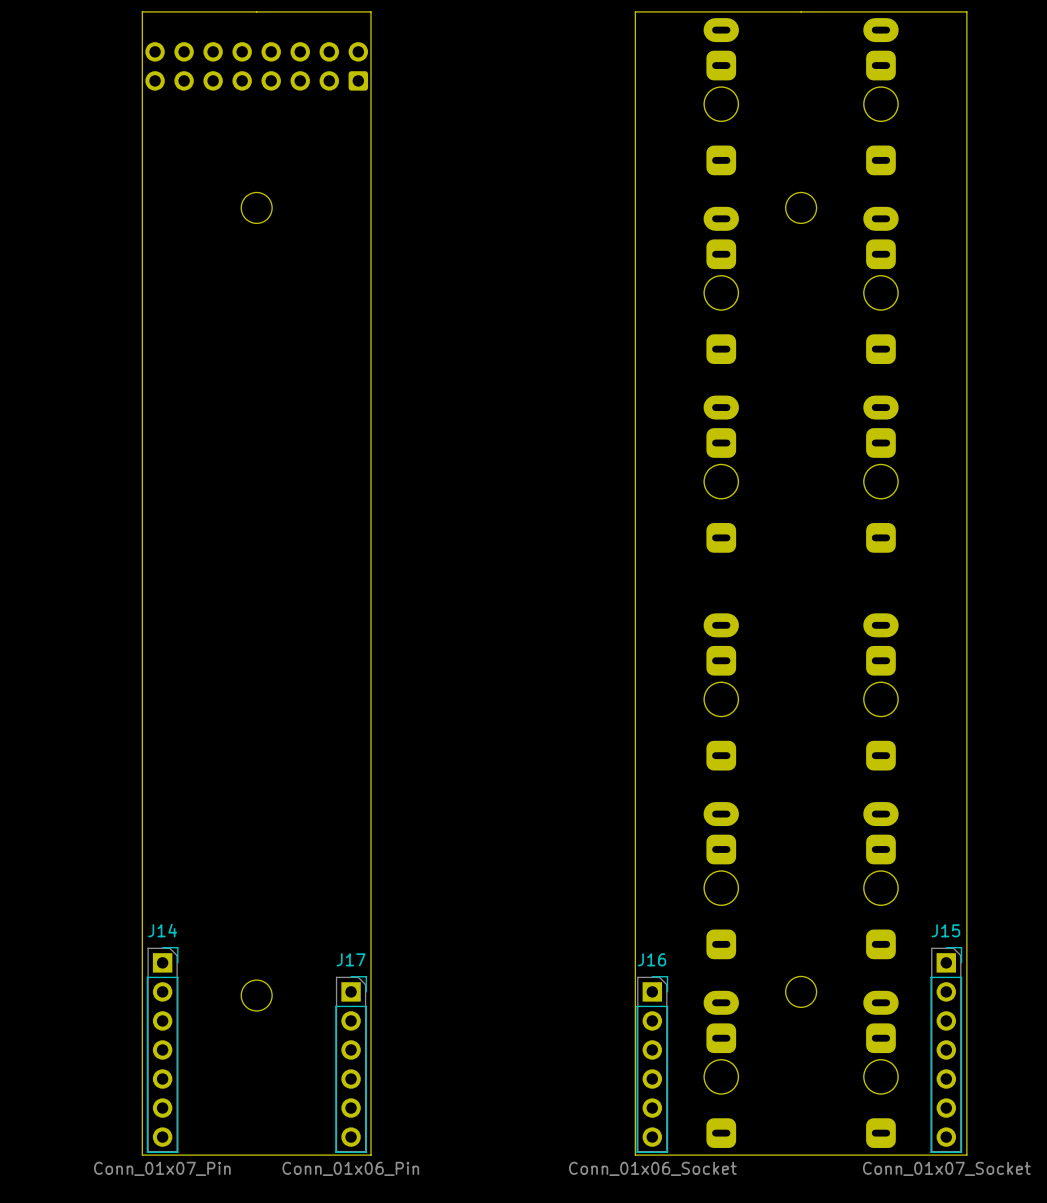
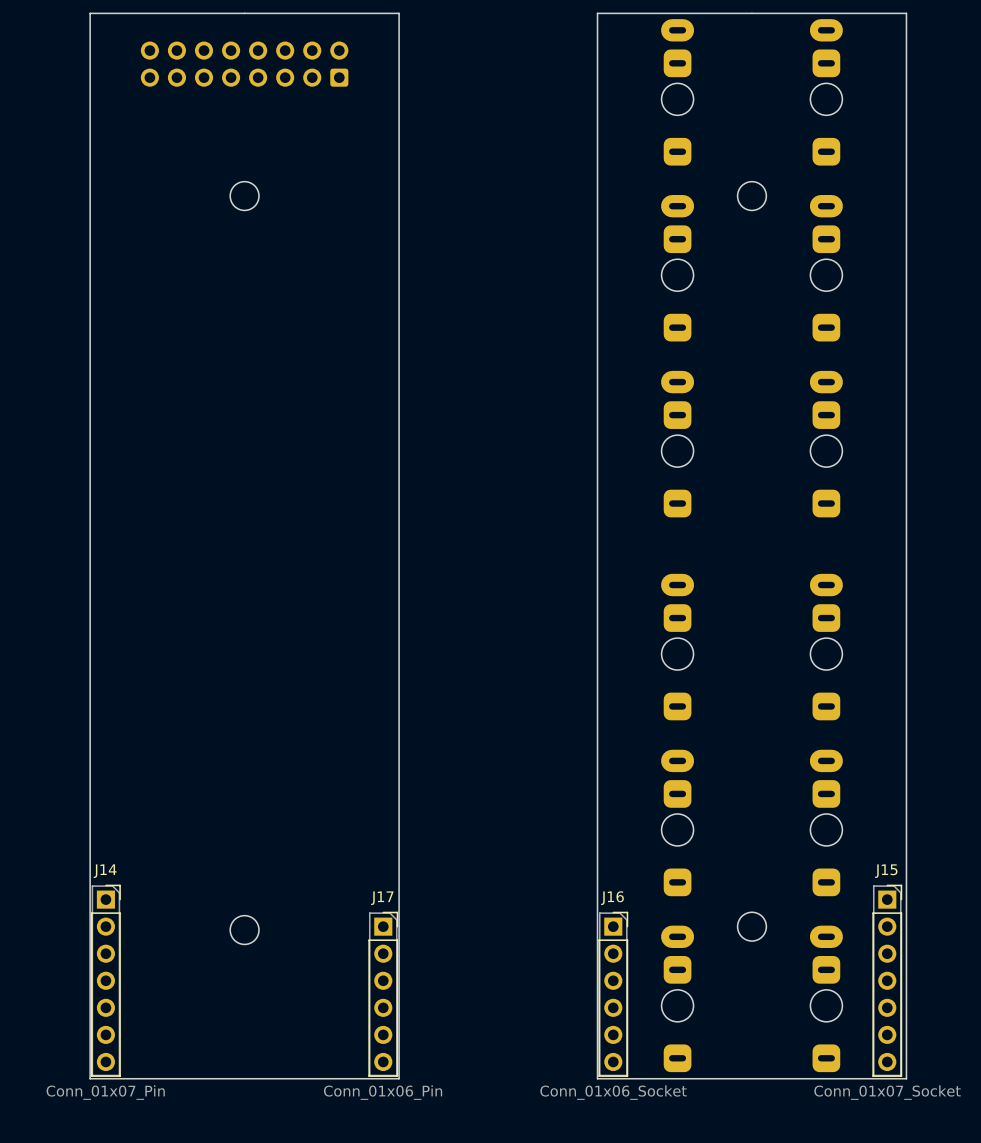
board edge: (142, 11) (142, 1155) -> (138, 13) (90, 13) (90, 1078) (138, 1078)
board edge: (371, 11) (371, 1155) -> (351, 13) (399, 13) (399, 1078) (351, 1078)
J14 position: (162, 1049) -> (105, 980)
J17 position: (351, 1064) -> (383, 994)

